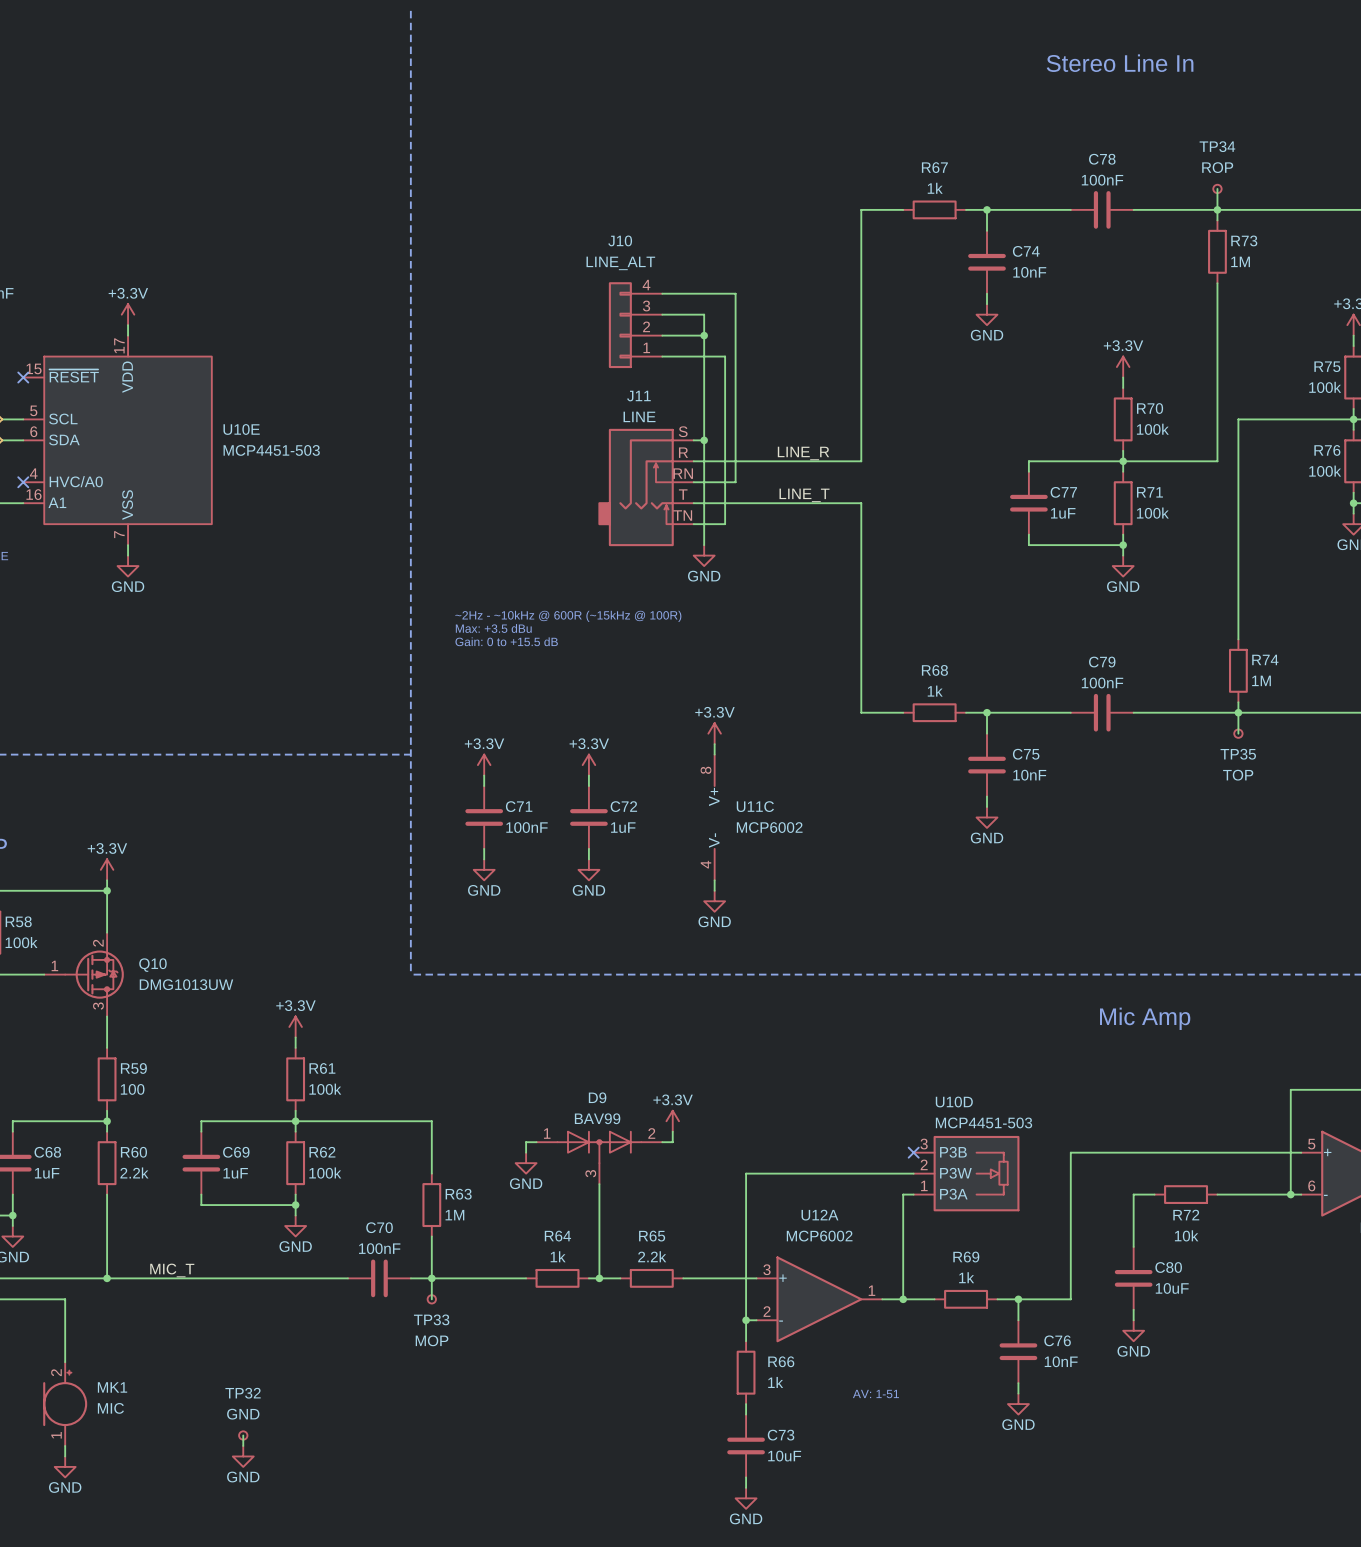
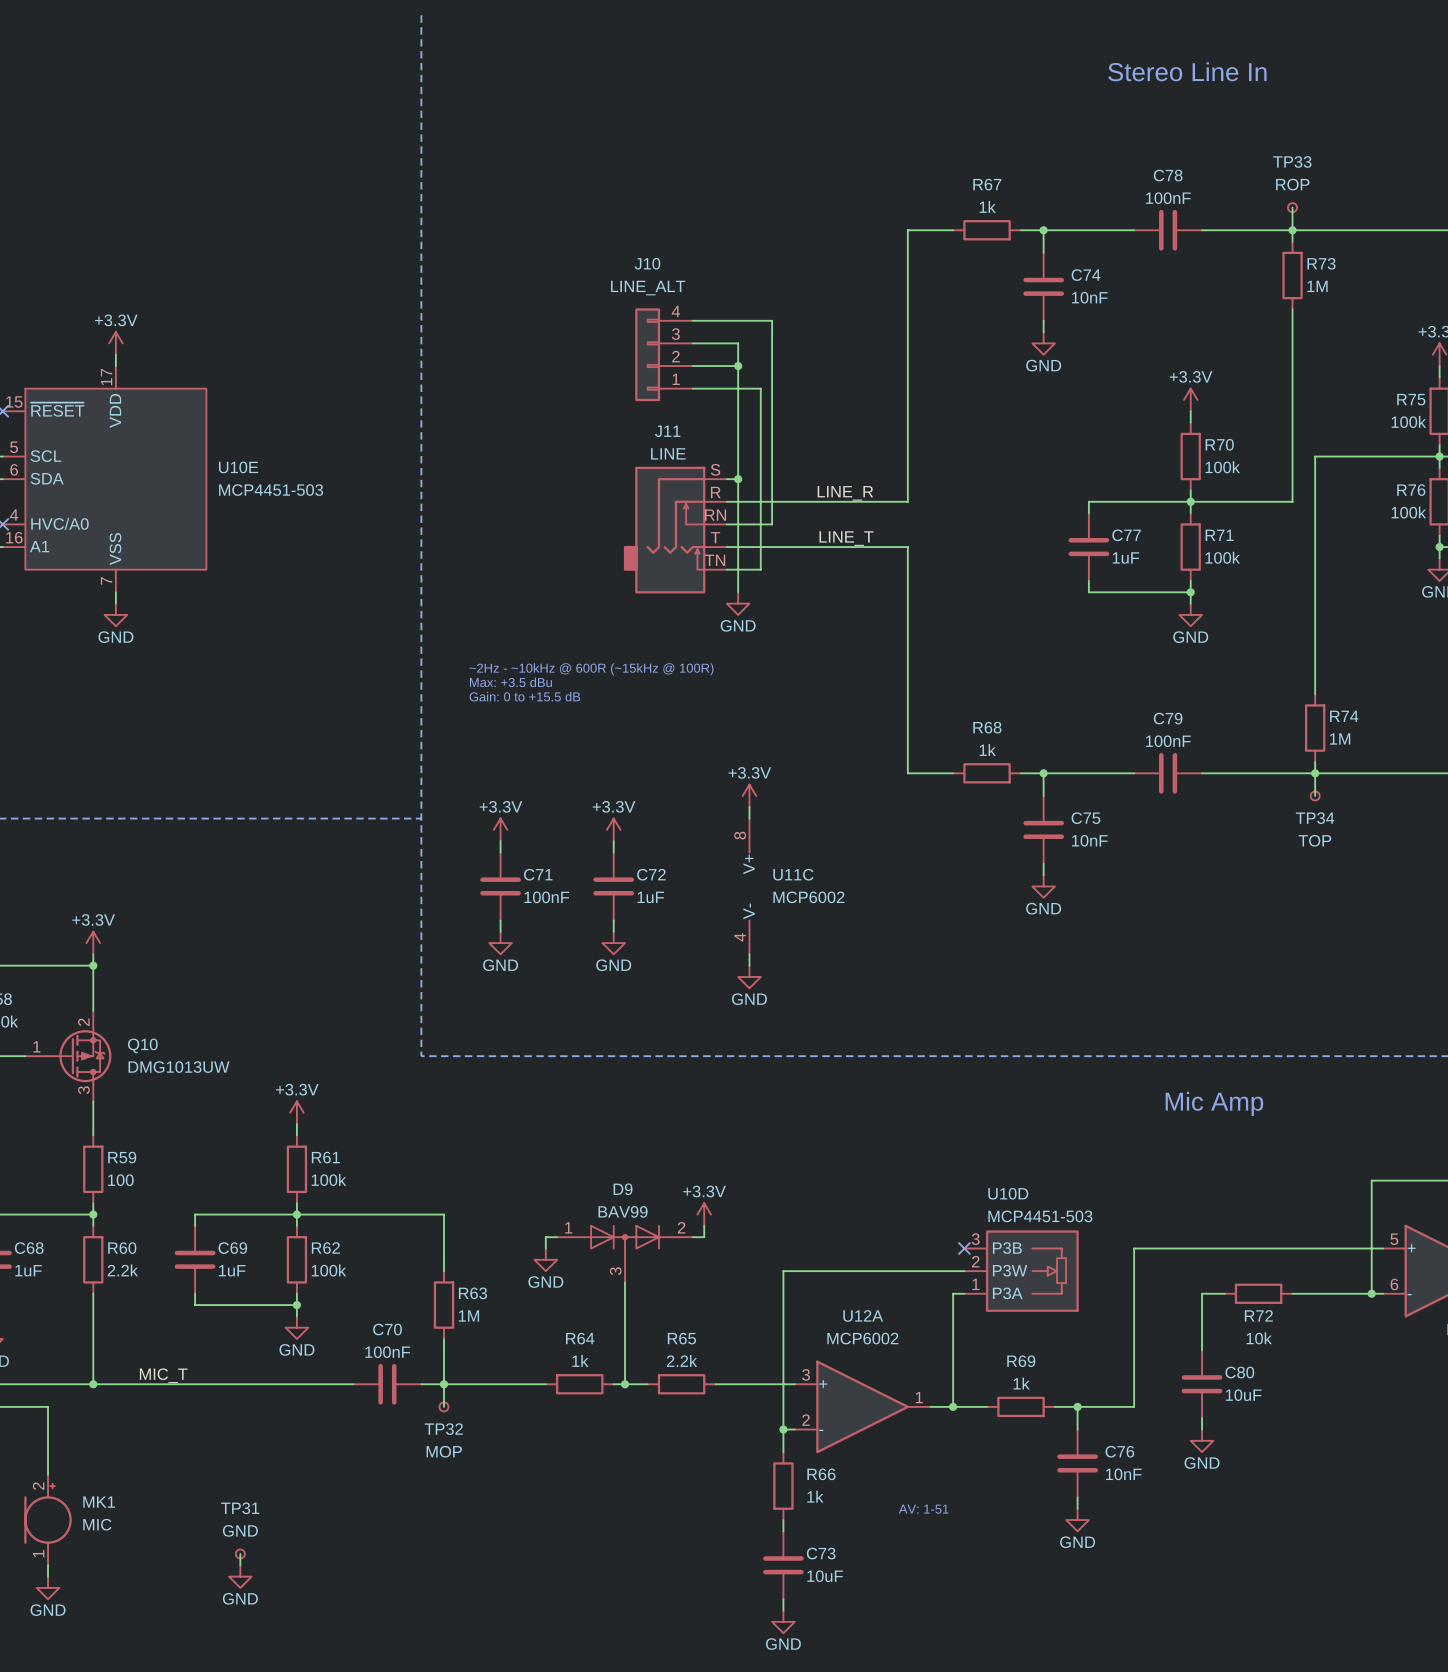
TP34 name: TP34 (1217, 146) -> TP33 (1292, 161)
TP35 name: TP35 (1238, 754) -> TP34 (1315, 818)
TP33 name: TP33 (431, 1319) -> TP32 (443, 1429)
TP32 name: TP32 (243, 1393) -> TP31 (240, 1508)

